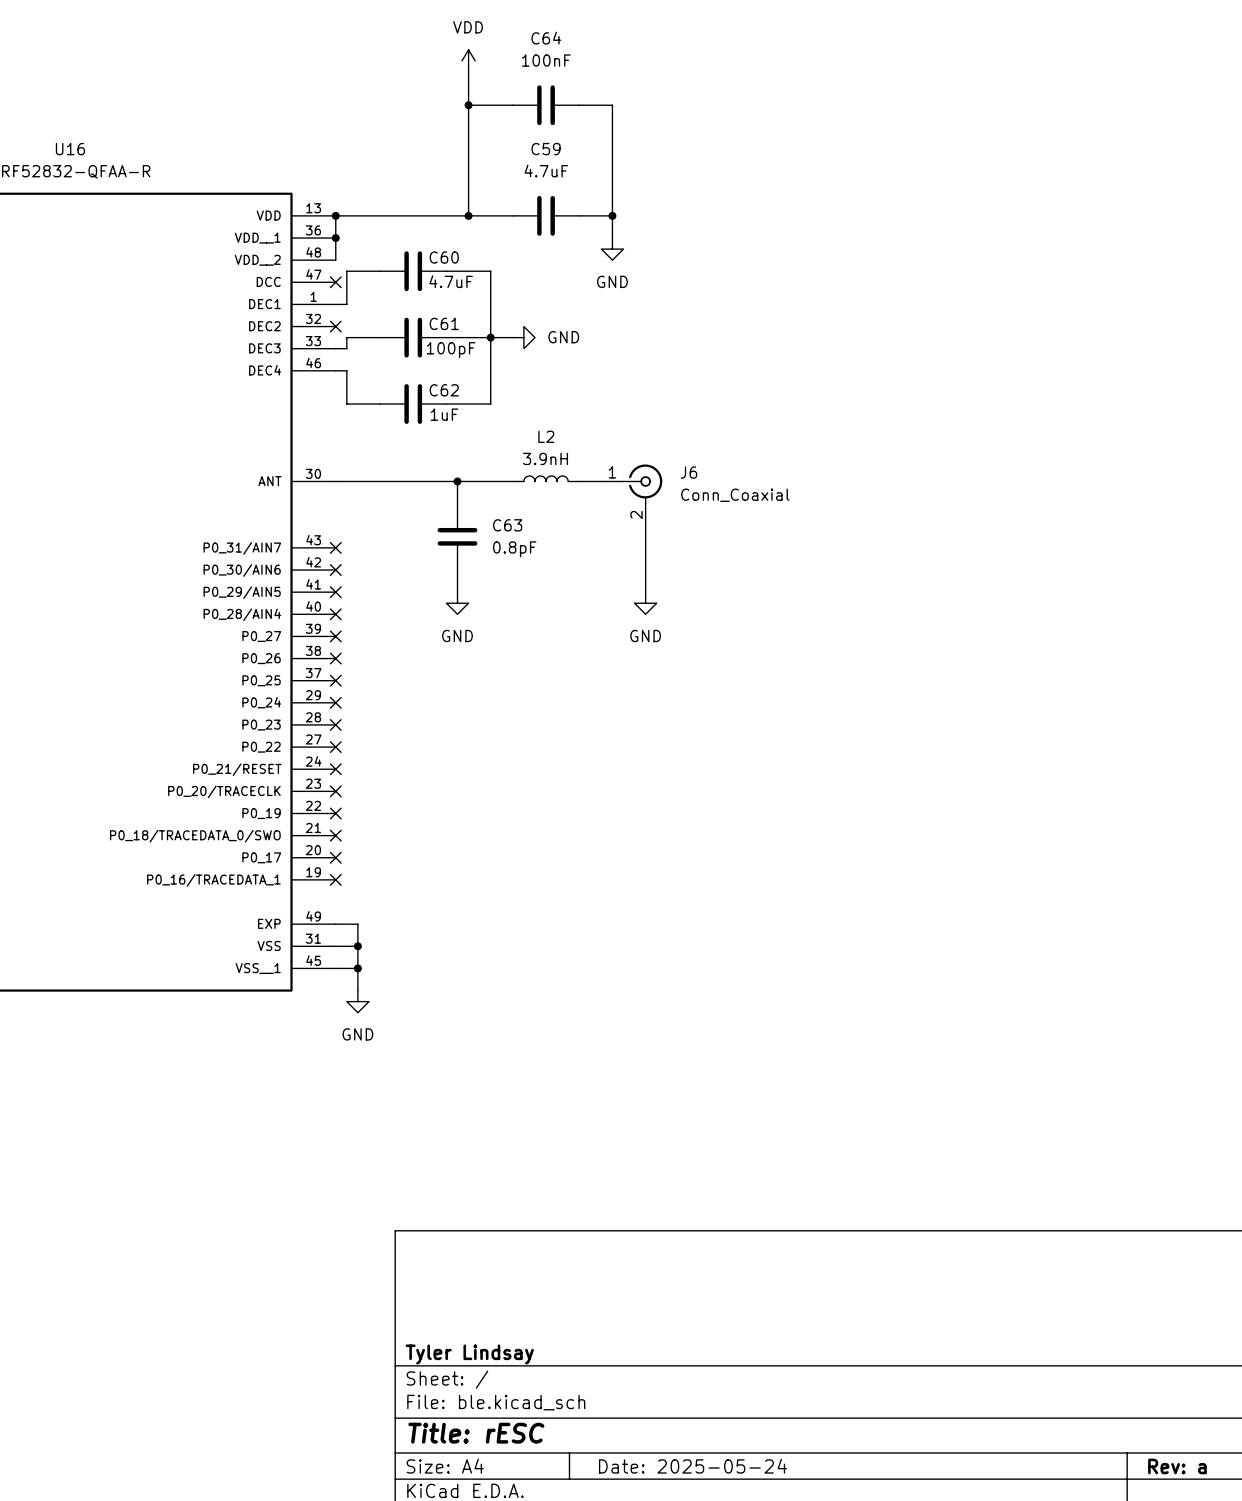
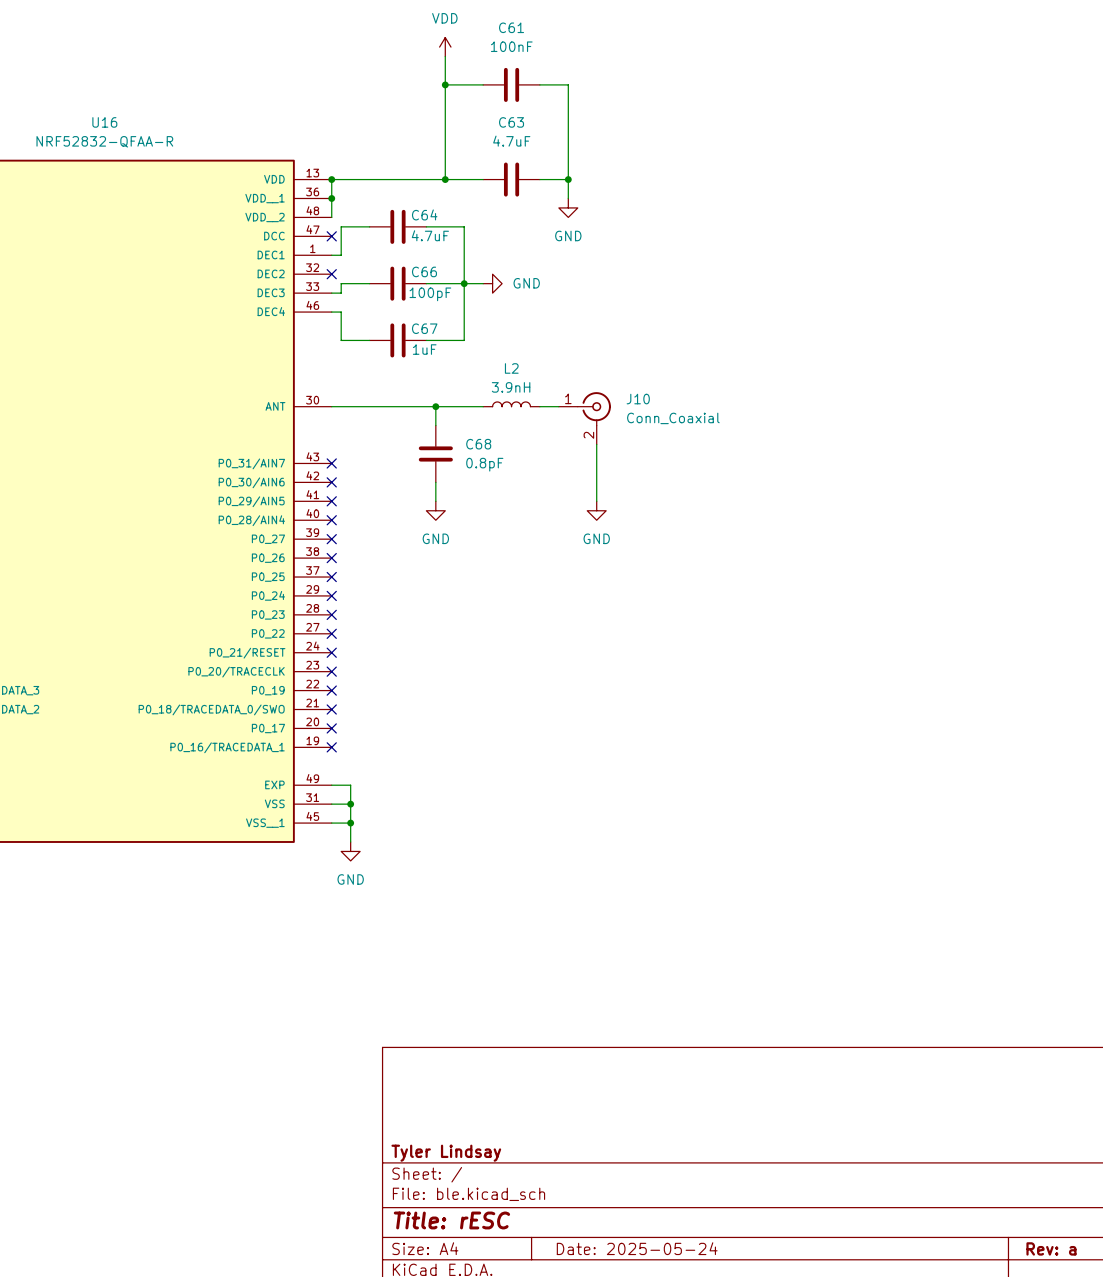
C64 name: C64 (546, 38) -> C61 (511, 27)
C59 name: C59 (546, 149) -> C63 (511, 122)
C60 name: C60 (444, 257) -> C64 (424, 214)
C61 name: C61 (444, 323) -> C66 (424, 271)
C62 name: C62 (444, 390) -> C67 (424, 328)
J6 name: J6 (688, 472) -> J10 (638, 399)
C63 name: C63 (507, 525) -> C68 (478, 444)

